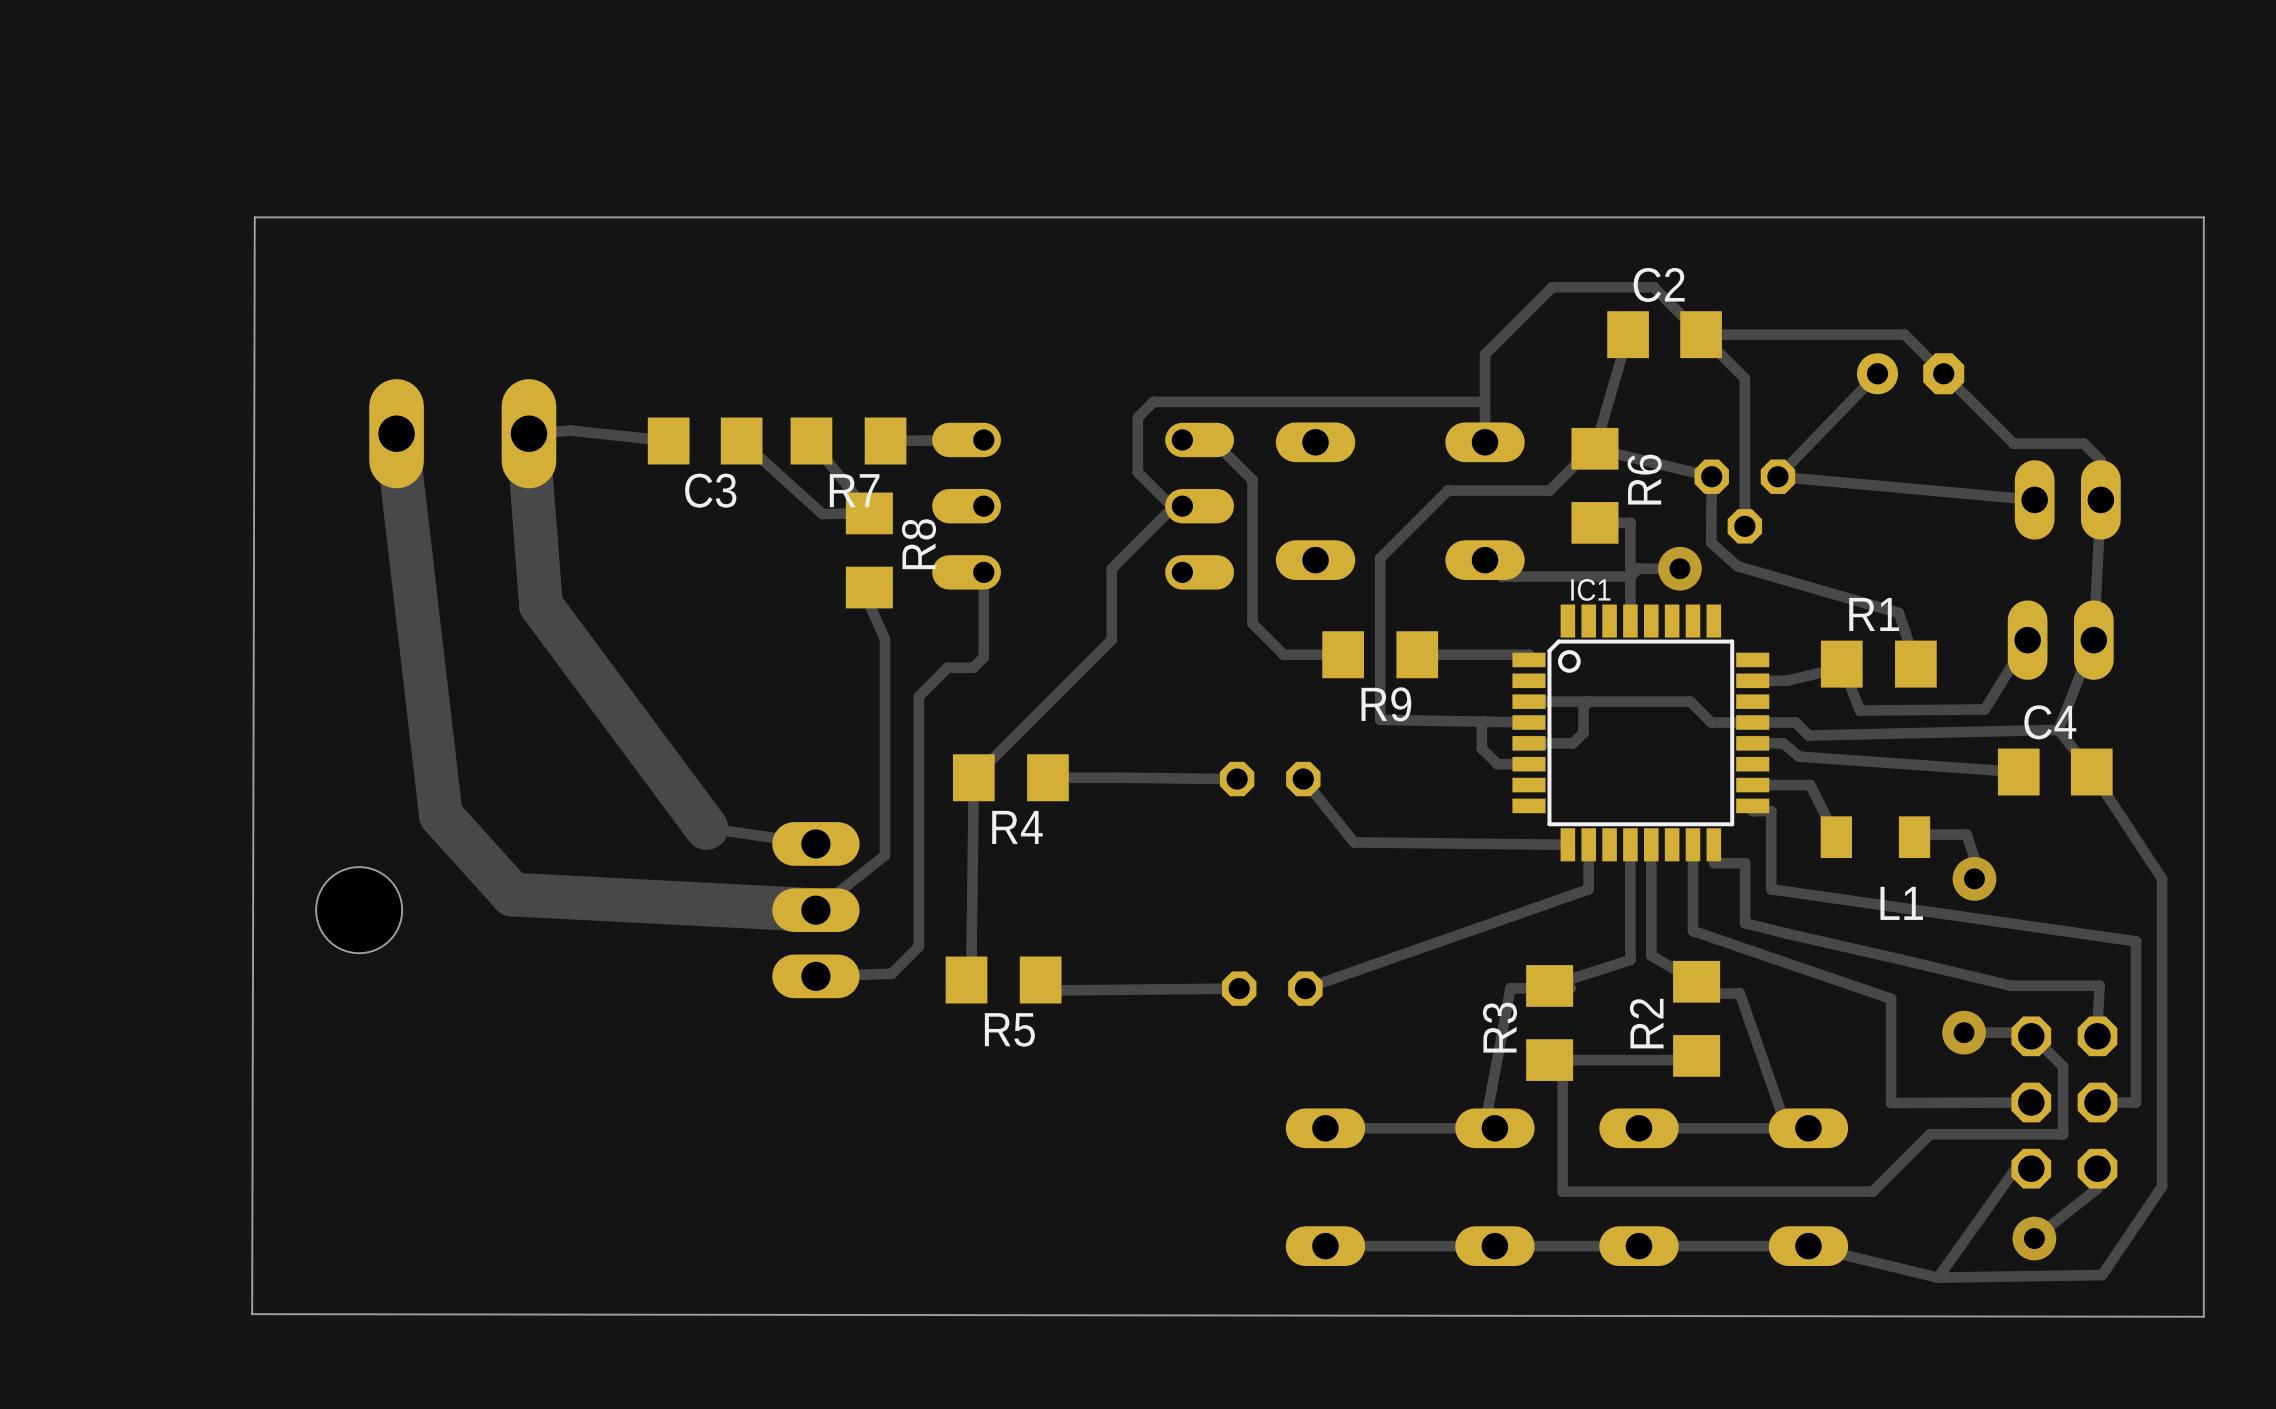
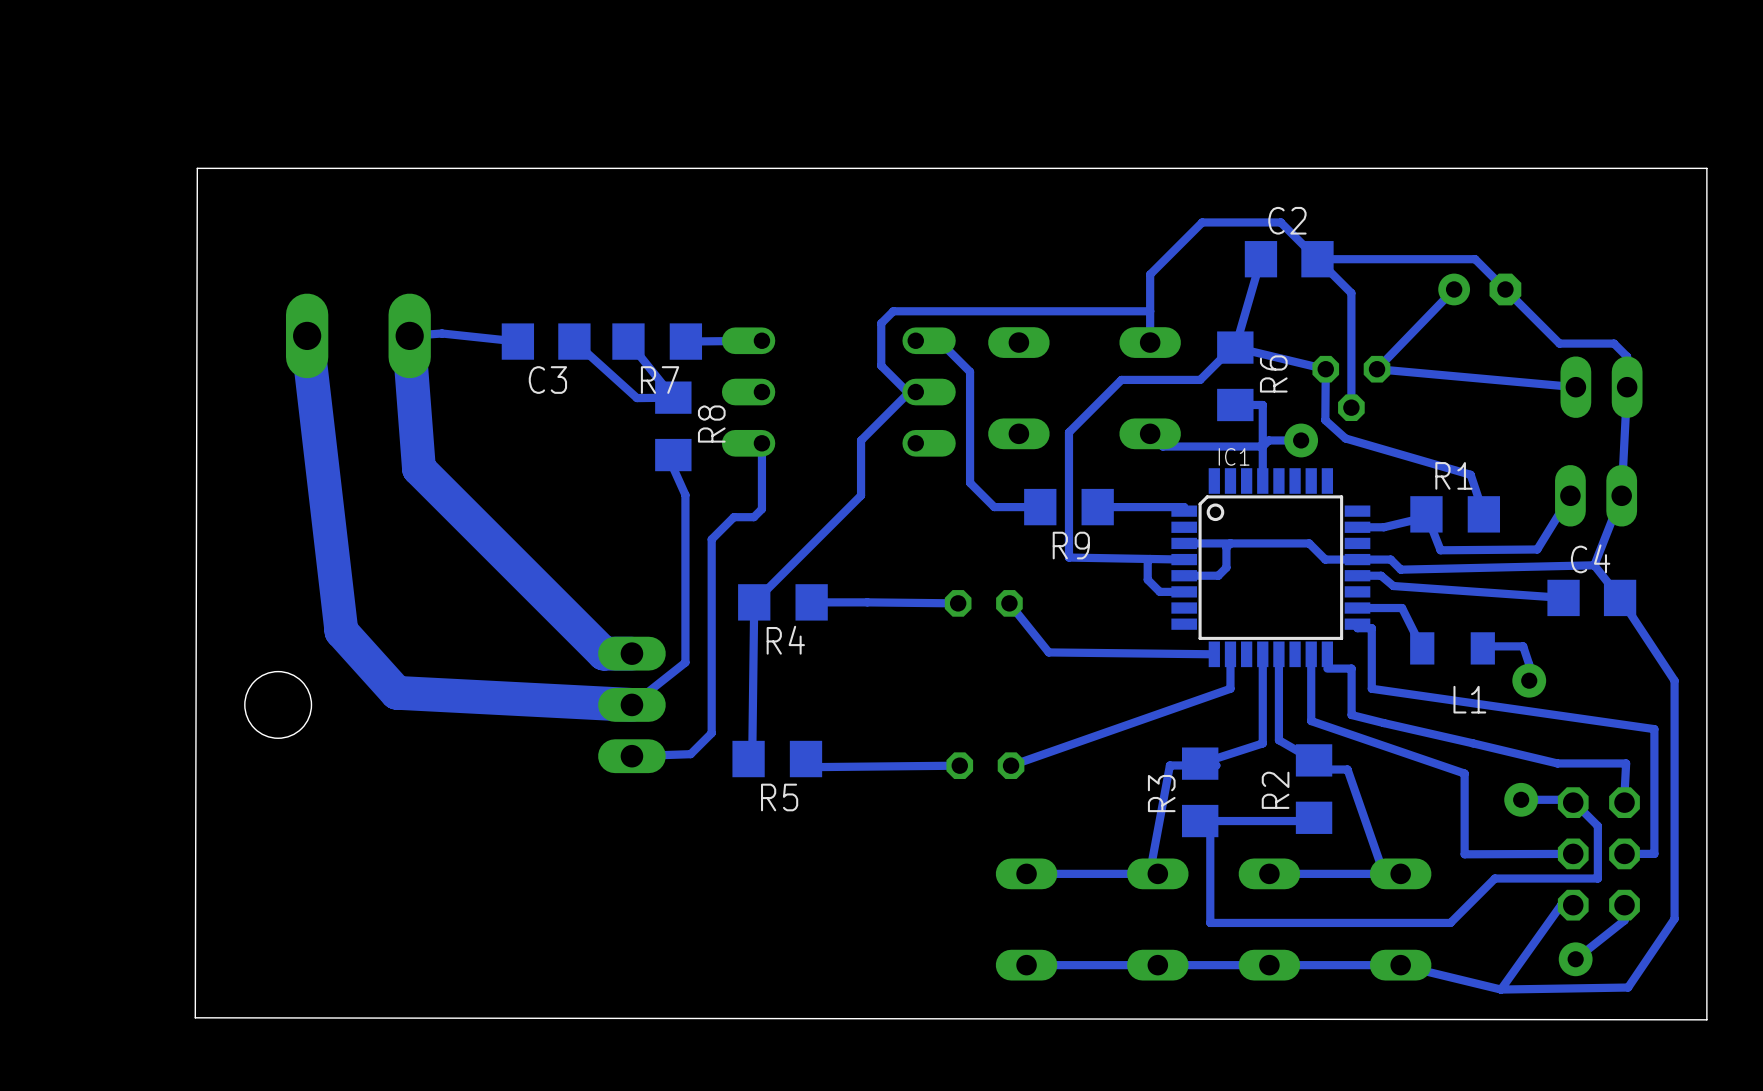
track: (540, 605) (706, 828) (815, 843) -> (418, 468) (603, 653) (631, 653)

